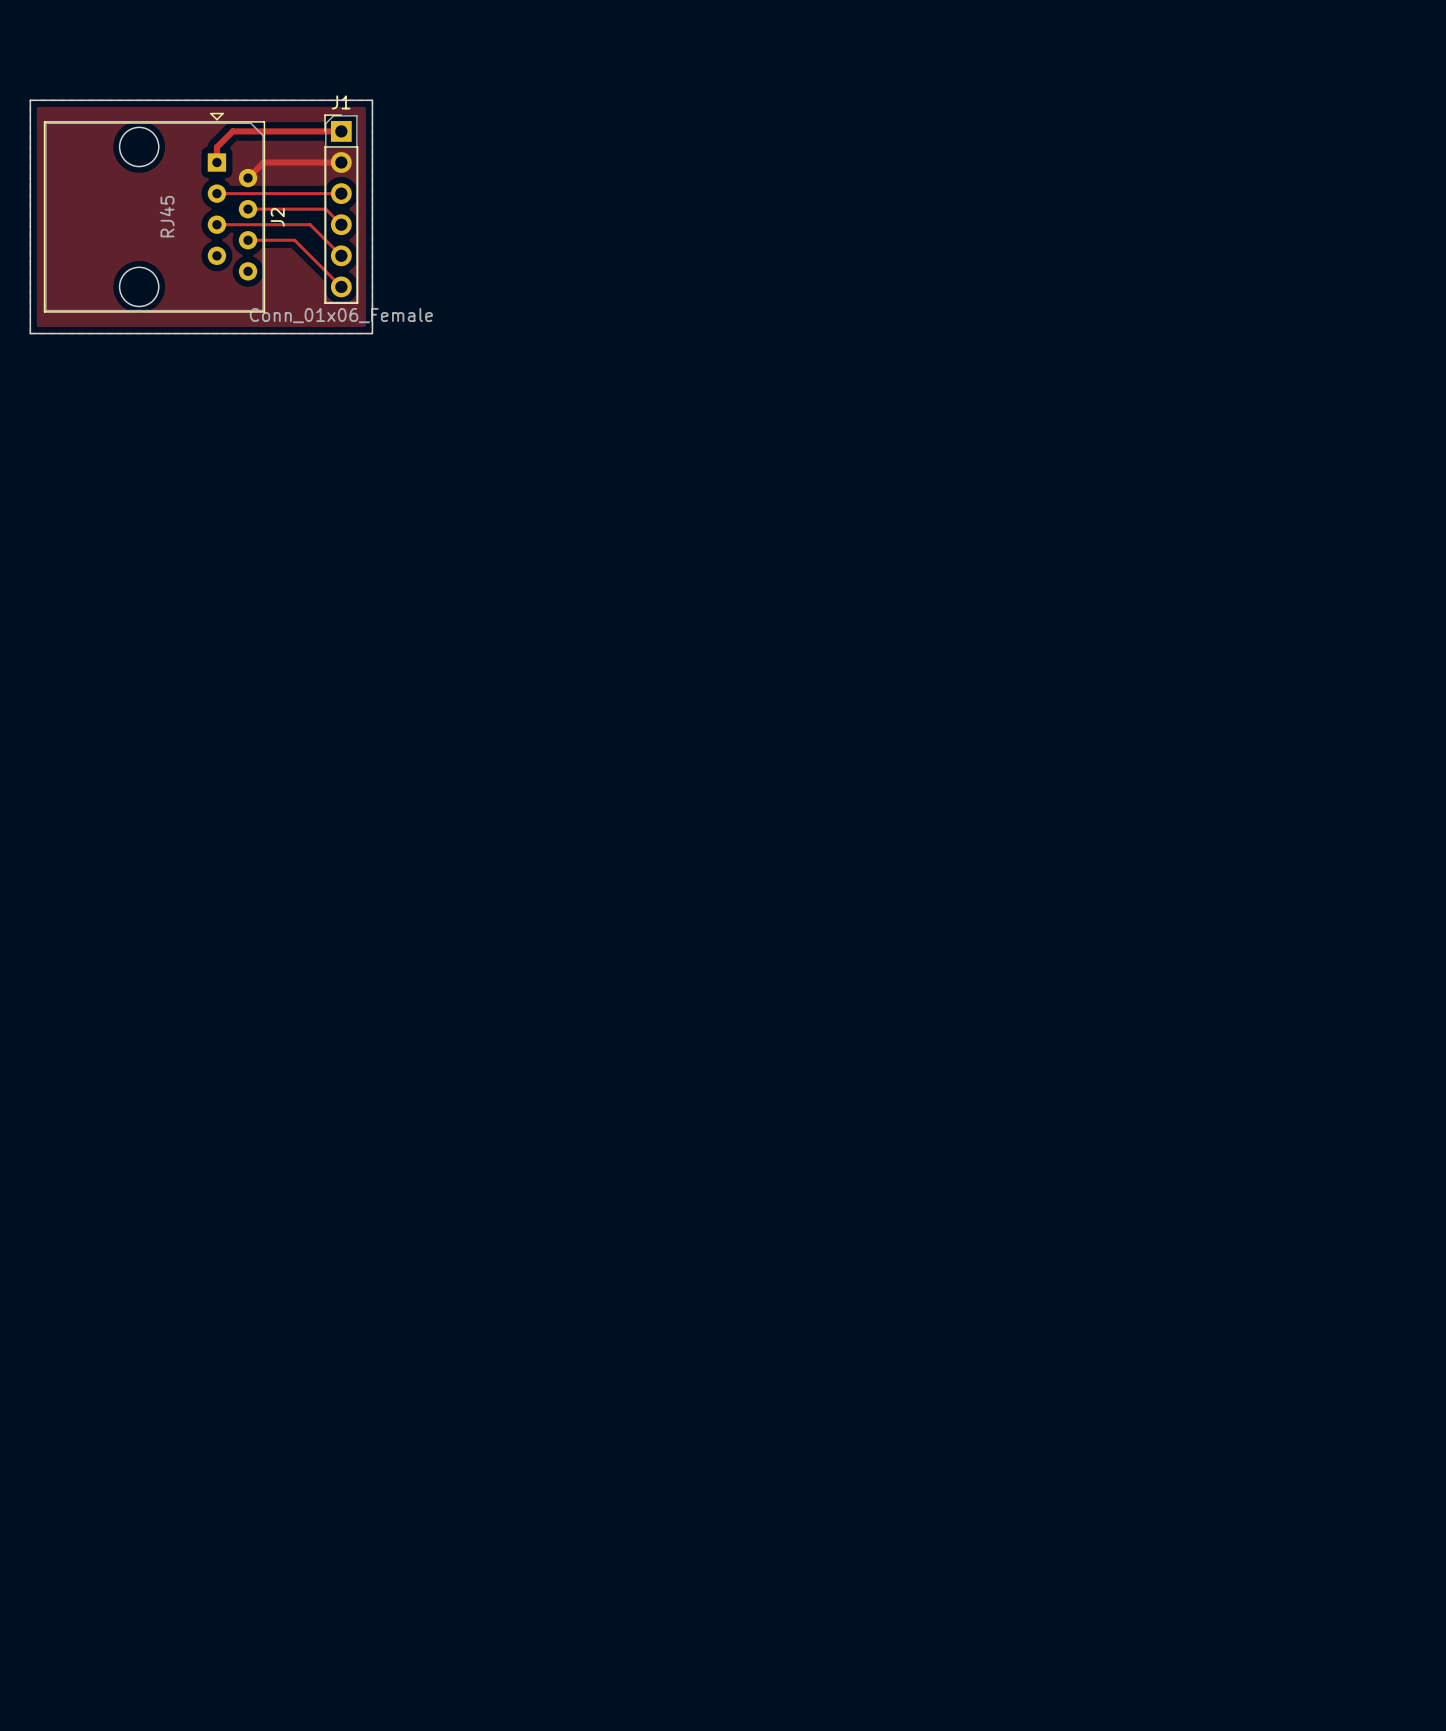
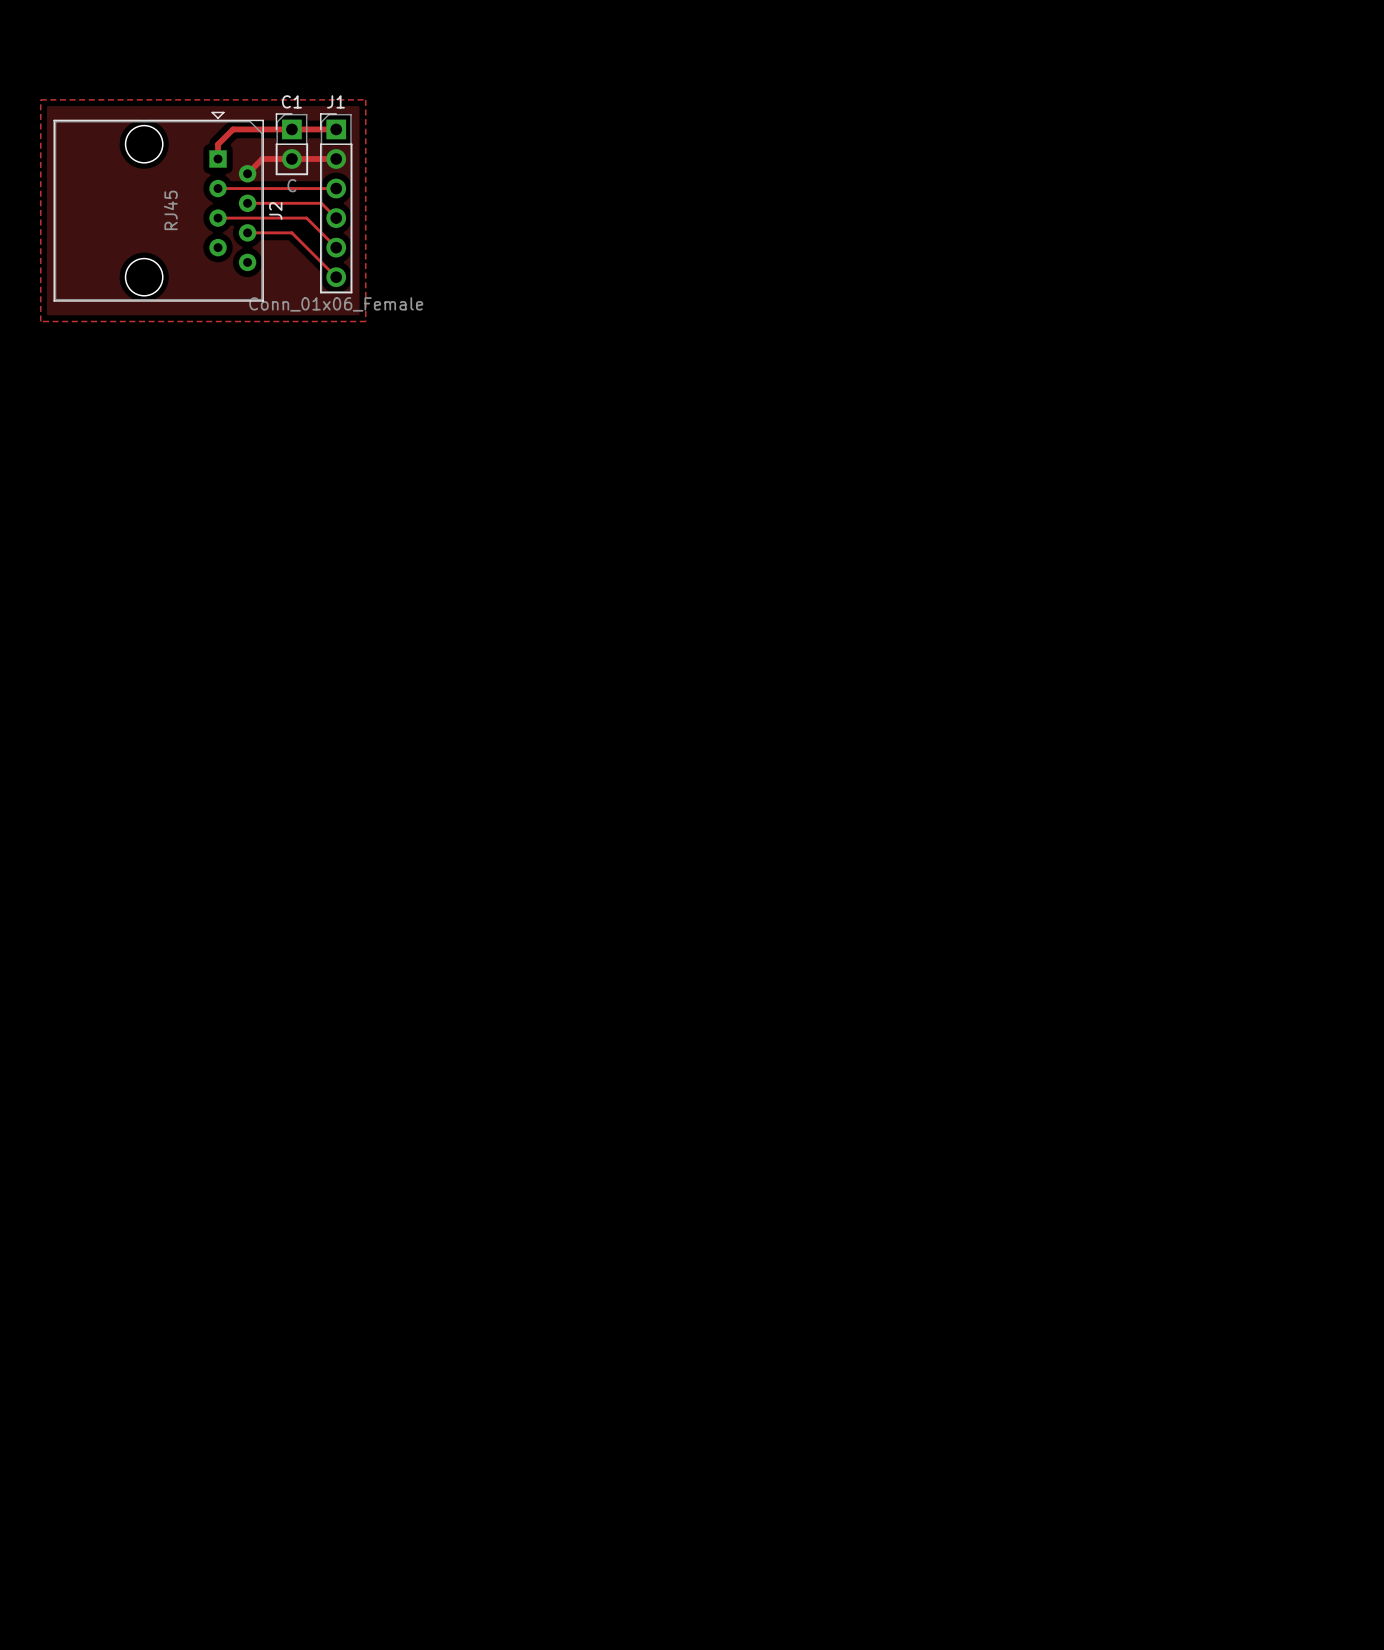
board edge: (30, 100) (372, 100) (372, 333) (30, 333) (30, 100) -> none
C1: none -> C (291, 144)

